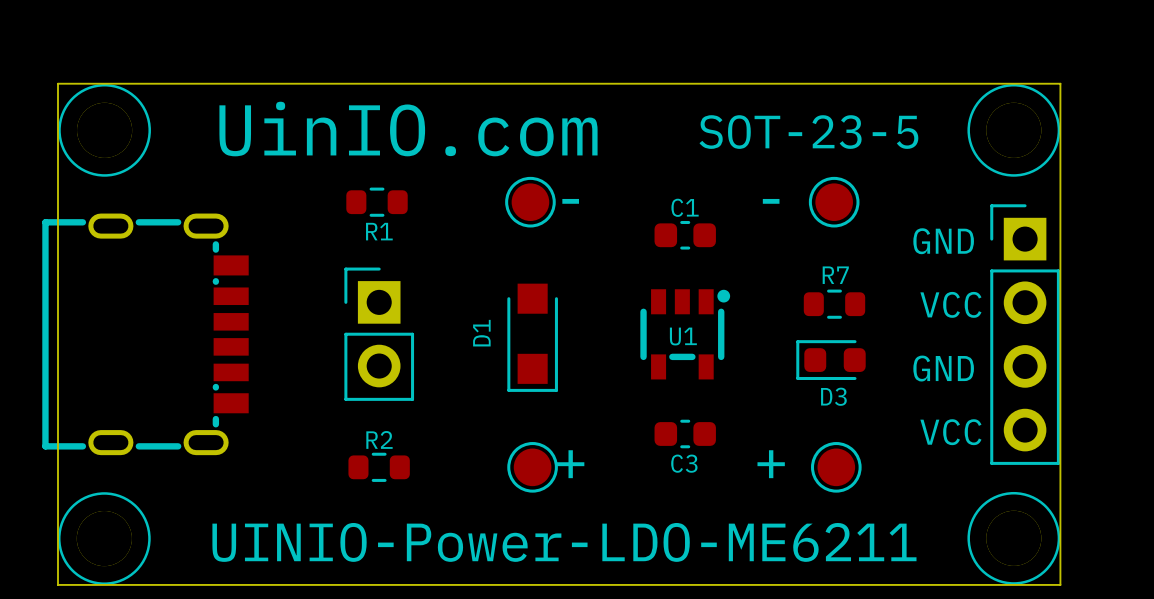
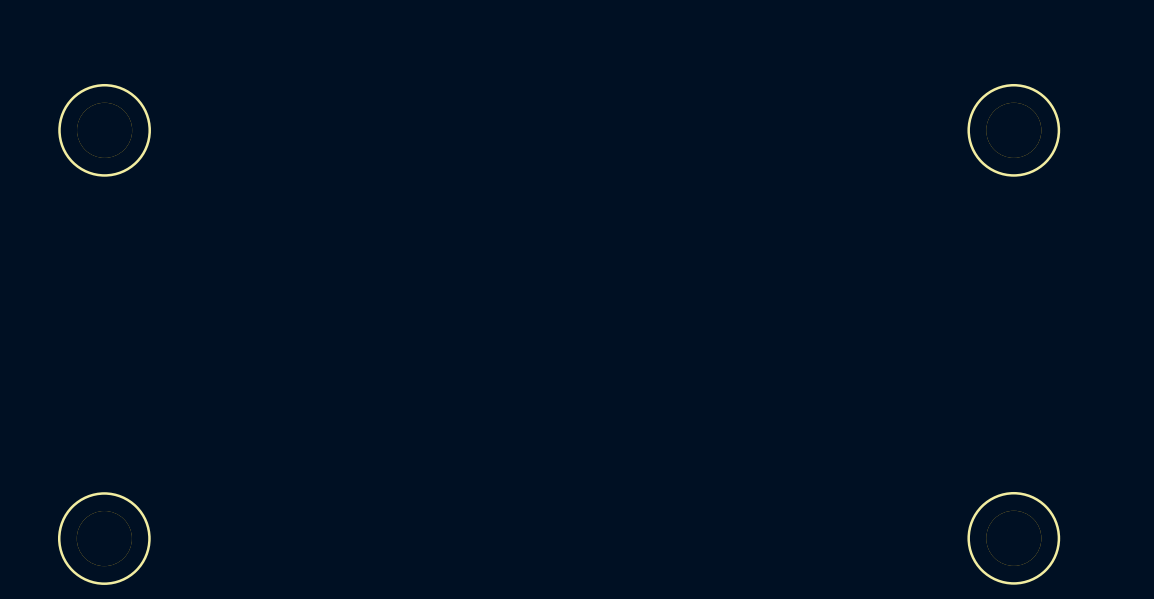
board edge: (57, 83) (1060, 83) (1060, 584) (57, 584) (57, 83) -> none
text: UinIO.com (408, 129) -> none
text: SOT-23-5 (808, 132) -> none
text: - (570, 201) -> none
text: - (771, 201) -> none
R1: (377, 202) -> none
part: (530, 202) -> none
part: (834, 202) -> none
C1: (685, 235) -> none
text: GND (943, 241) -> none
R7: (834, 304) -> none
text: VCC (950, 304) -> none
part: (145, 334) -> none
part: (379, 334) -> none
U1: (685, 334) -> none
part: (1025, 334) -> none
D1: (532, 337) -> none
D3: (830, 360) -> none
text: GND (943, 368) -> none
text: VCC (950, 432) -> none
C3: (685, 434) -> none
text: + (570, 464) -> none
text: + (771, 464) -> none
R2: (379, 467) -> none
part: (532, 467) -> none
part: (836, 467) -> none
text: UINIO-Power-LDO-ME6211 (564, 542) -> none

